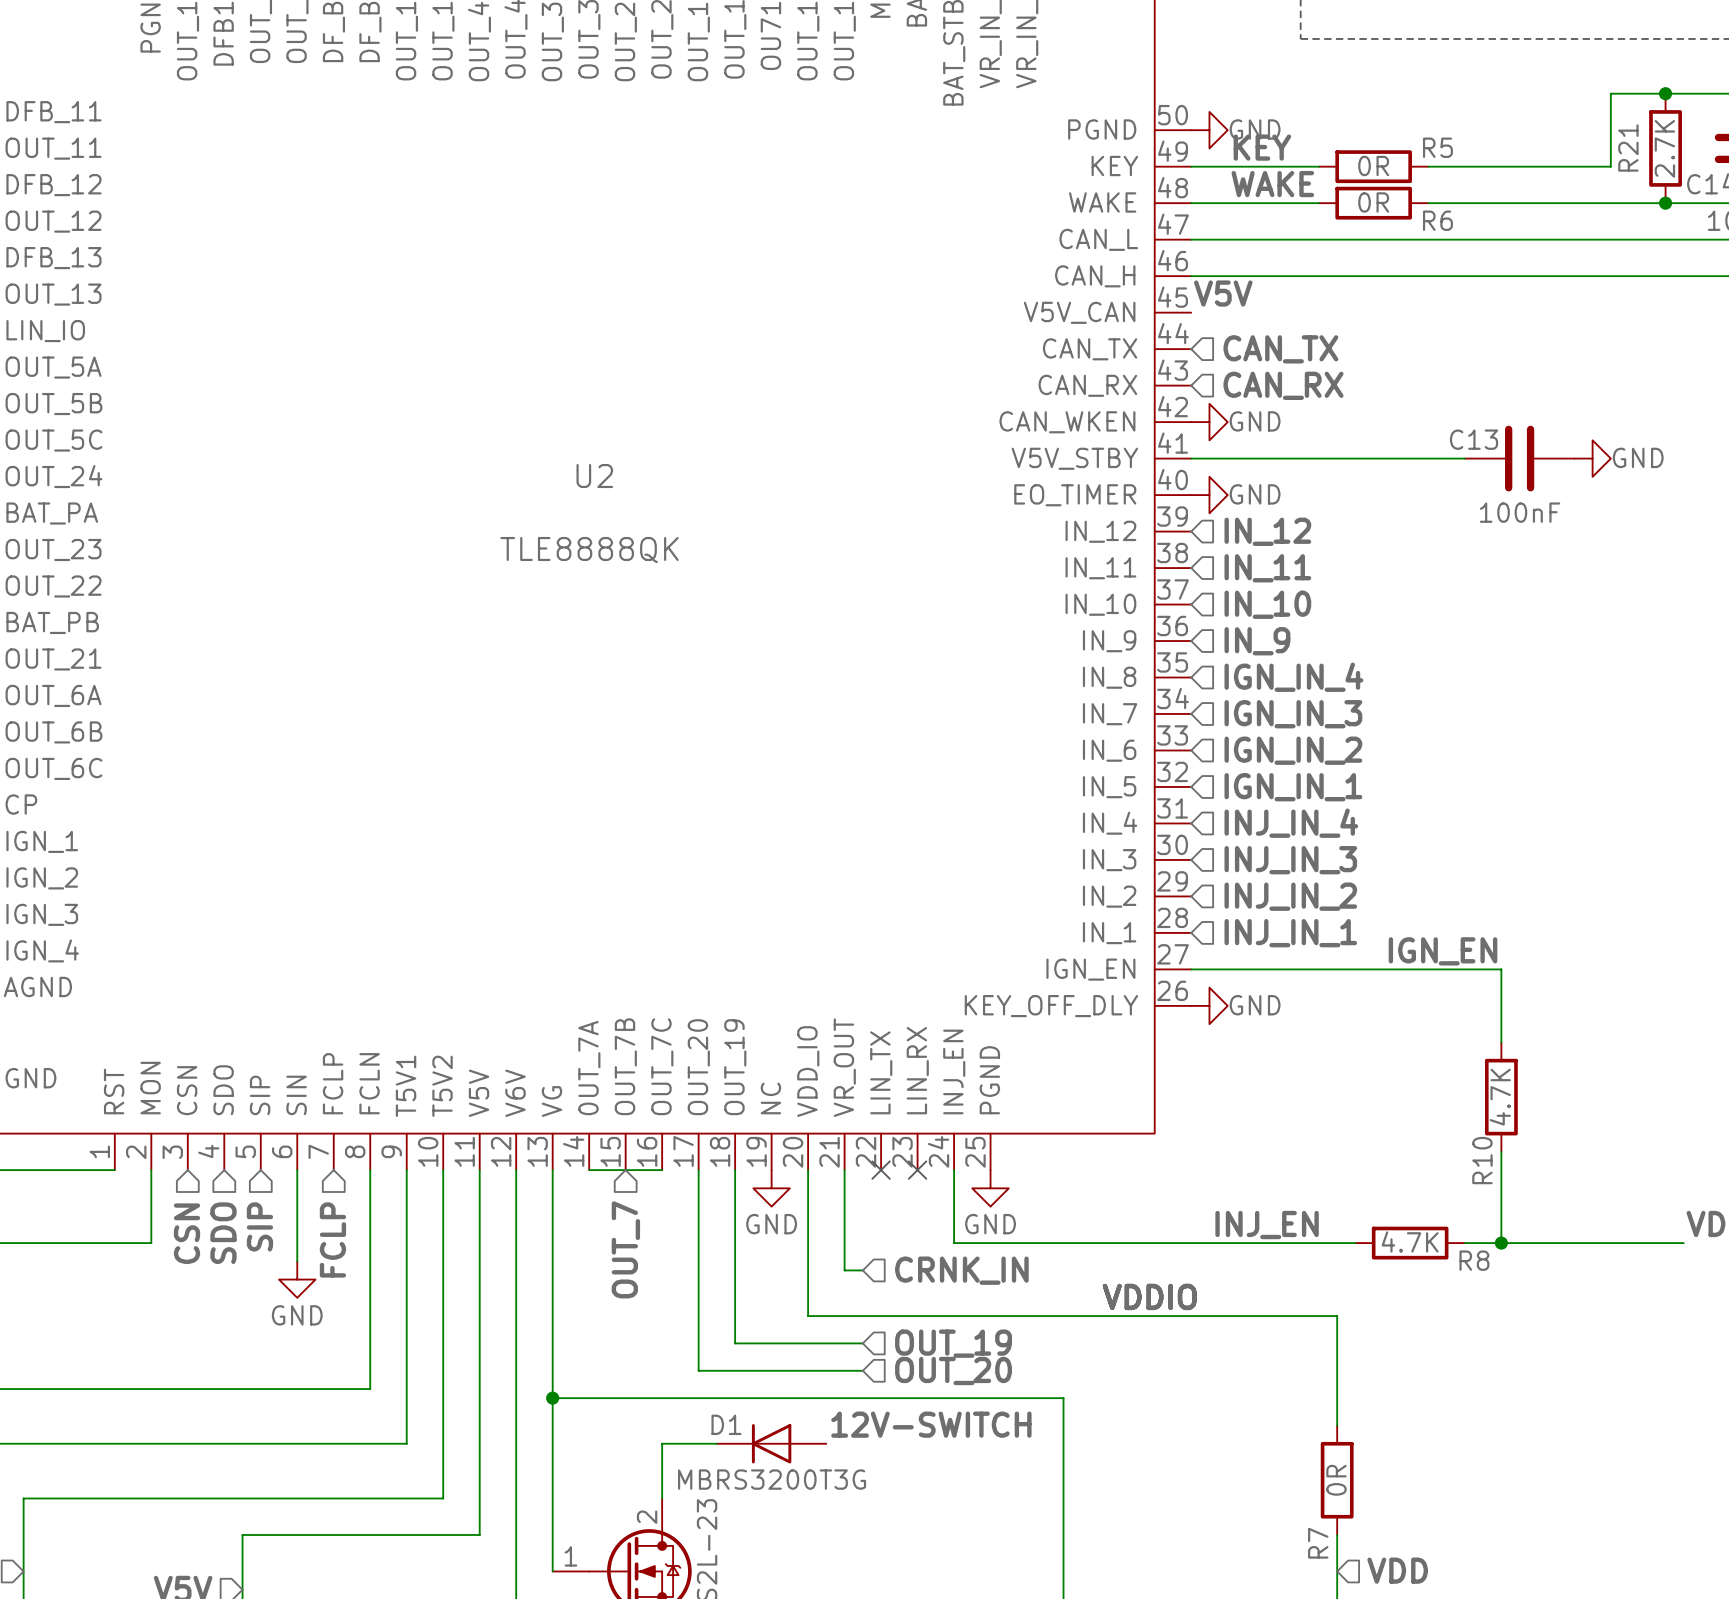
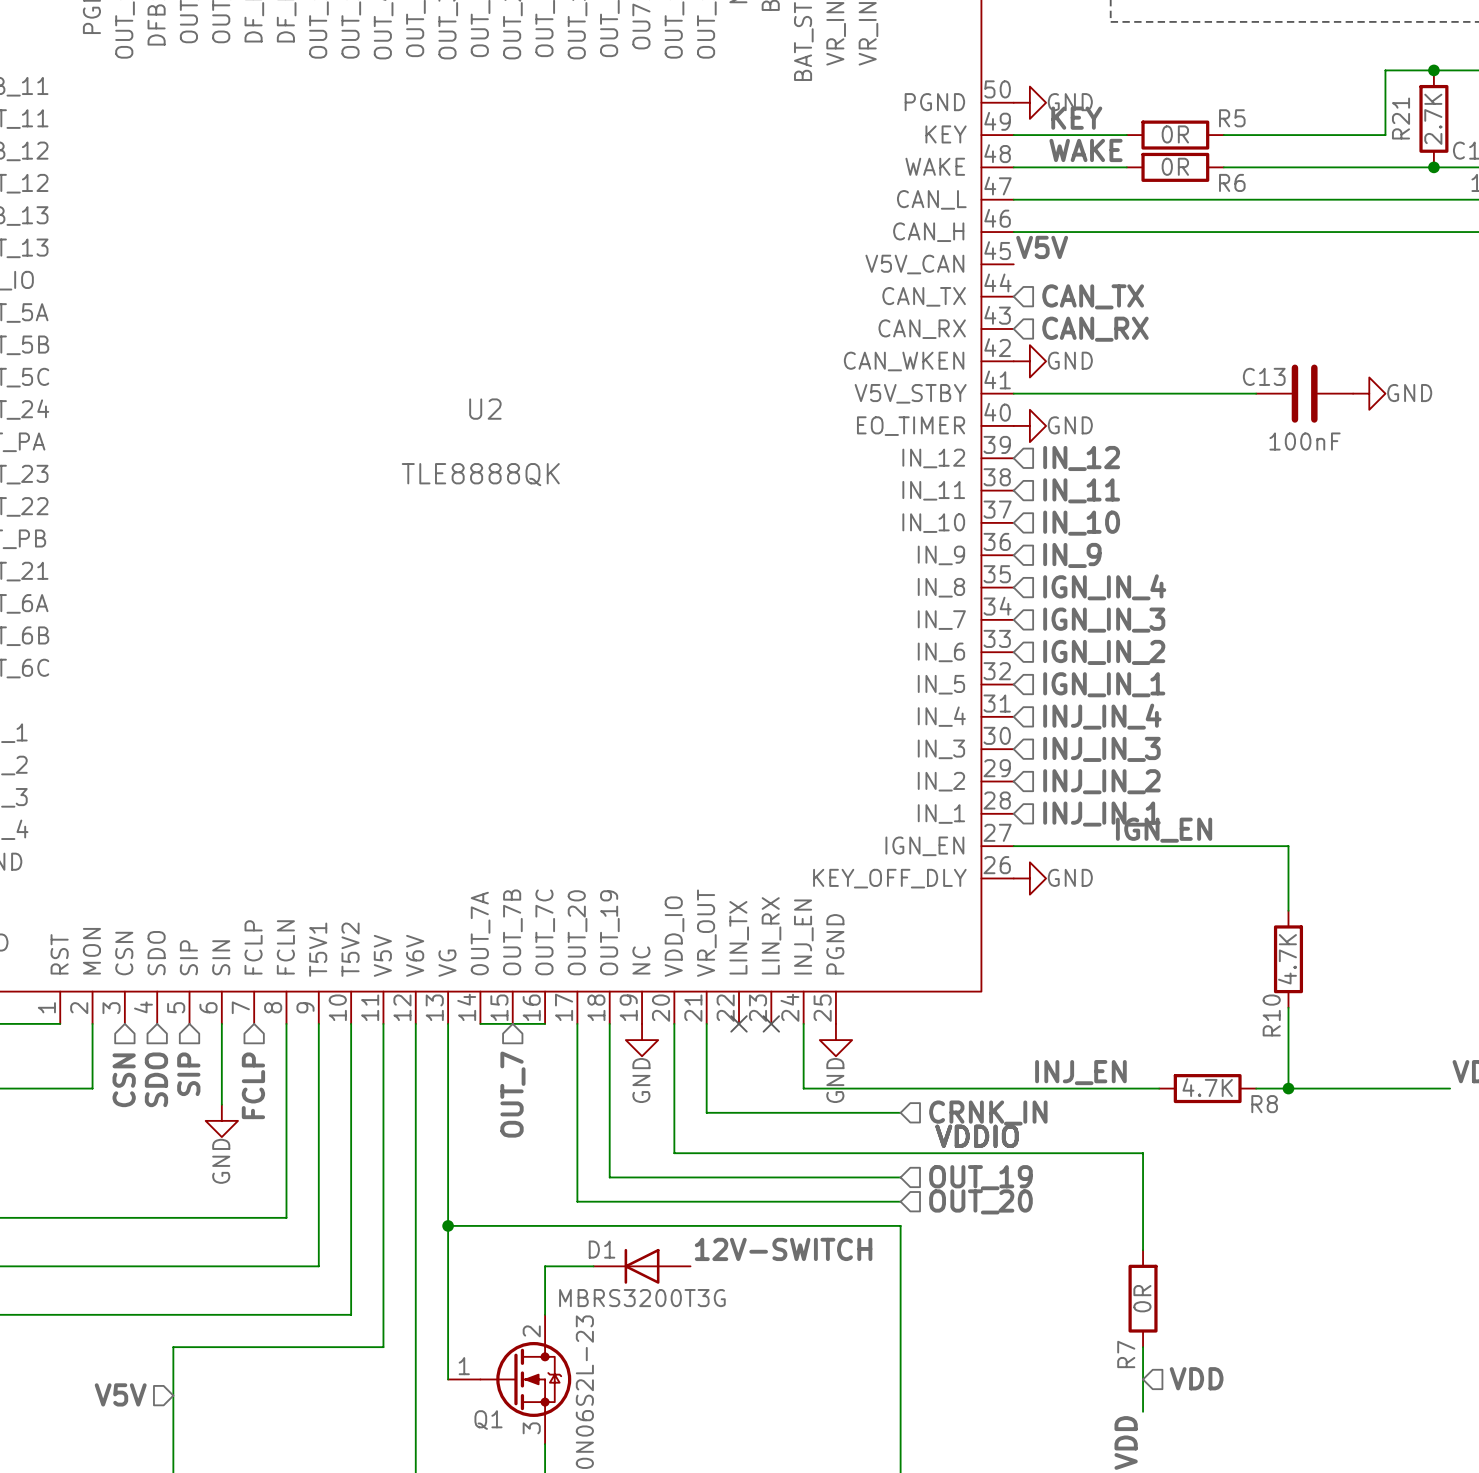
label position: IGN_EN (1443, 951) -> IGN_EN (1164, 830)
power symbol text rotation: 0° (771, 1224) -> 90° counterclockwise (641, 1080)
power symbol text rotation: 0° (990, 1224) -> 90° counterclockwise (835, 1080)
wire: none -> (722, 1112) (900, 1112)
hierarchical label position: CRNK_IN (961, 1270) -> CRNK_IN (988, 1113)
power symbol text rotation: 0° (297, 1315) -> 90° counterclockwise (221, 1161)
wire: none -> (722, 1177) (900, 1177)
hierarchical label position: OUT_19 (953, 1343) -> OUT_19 (980, 1177)
wire: none -> (722, 1201) (900, 1201)
hierarchical label position: OUT_20 (953, 1371) -> OUT_20 (980, 1201)

